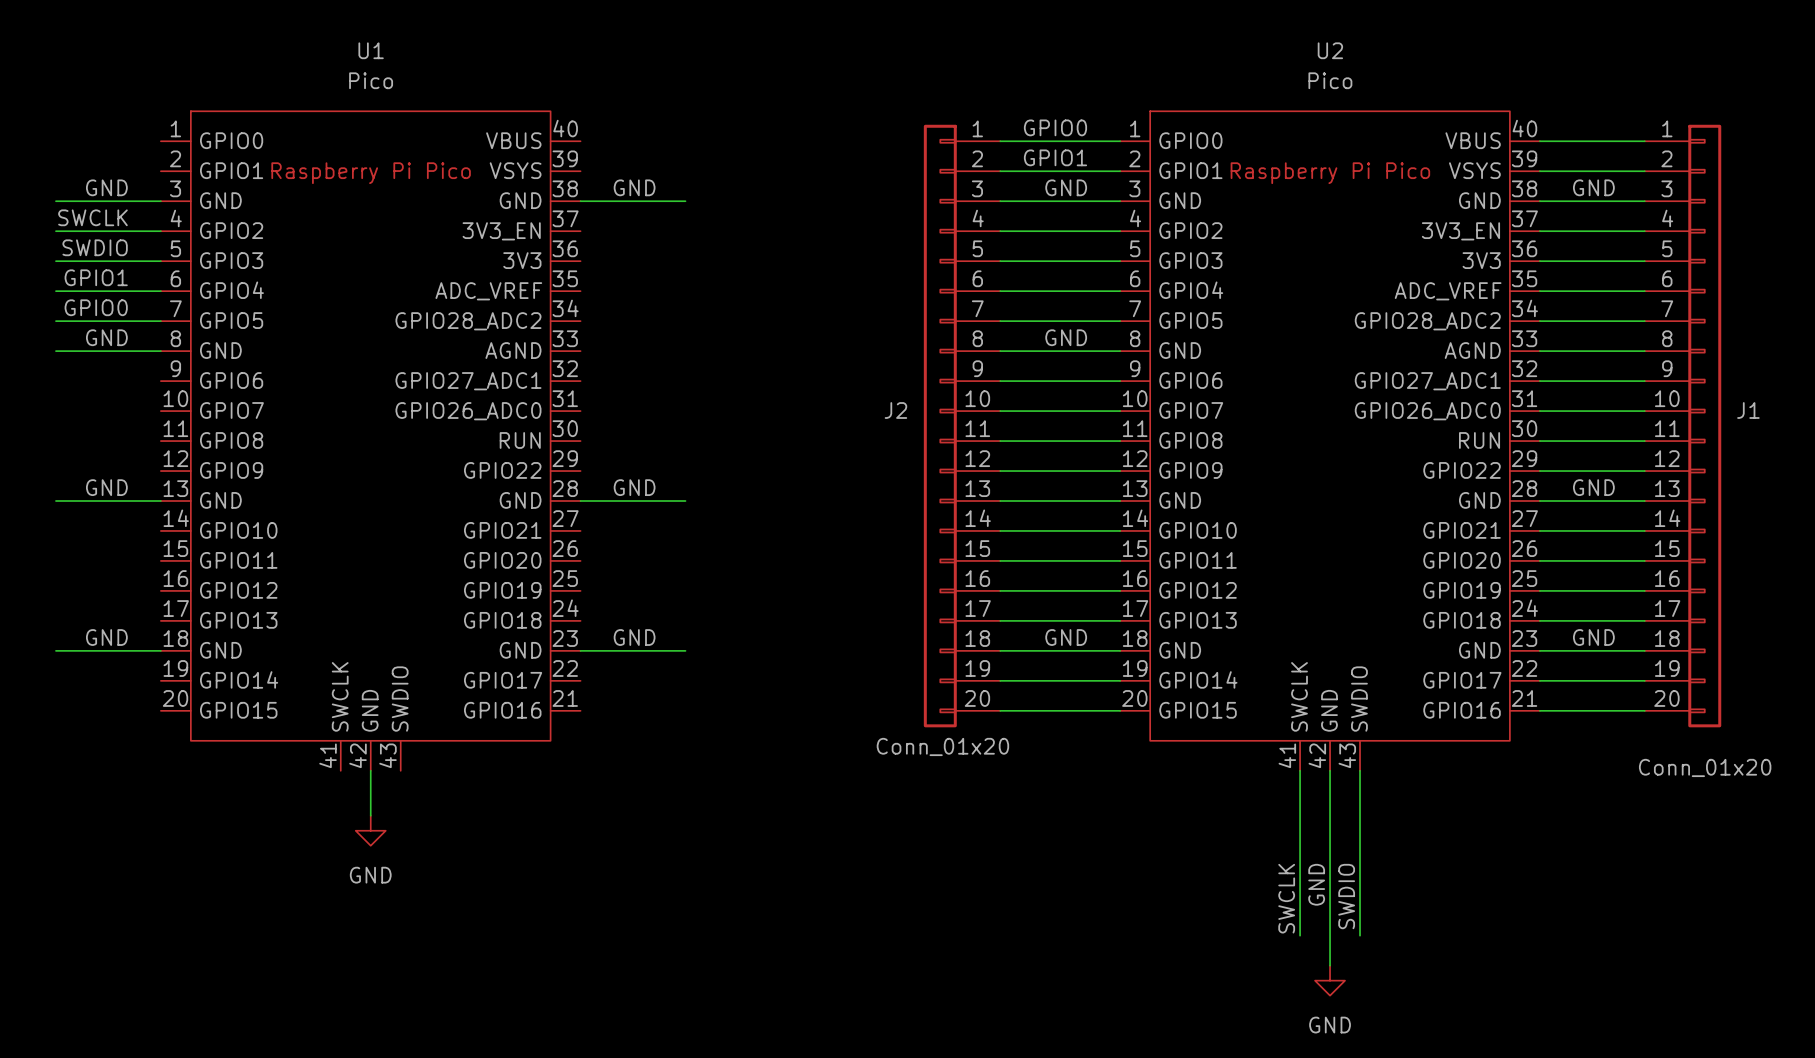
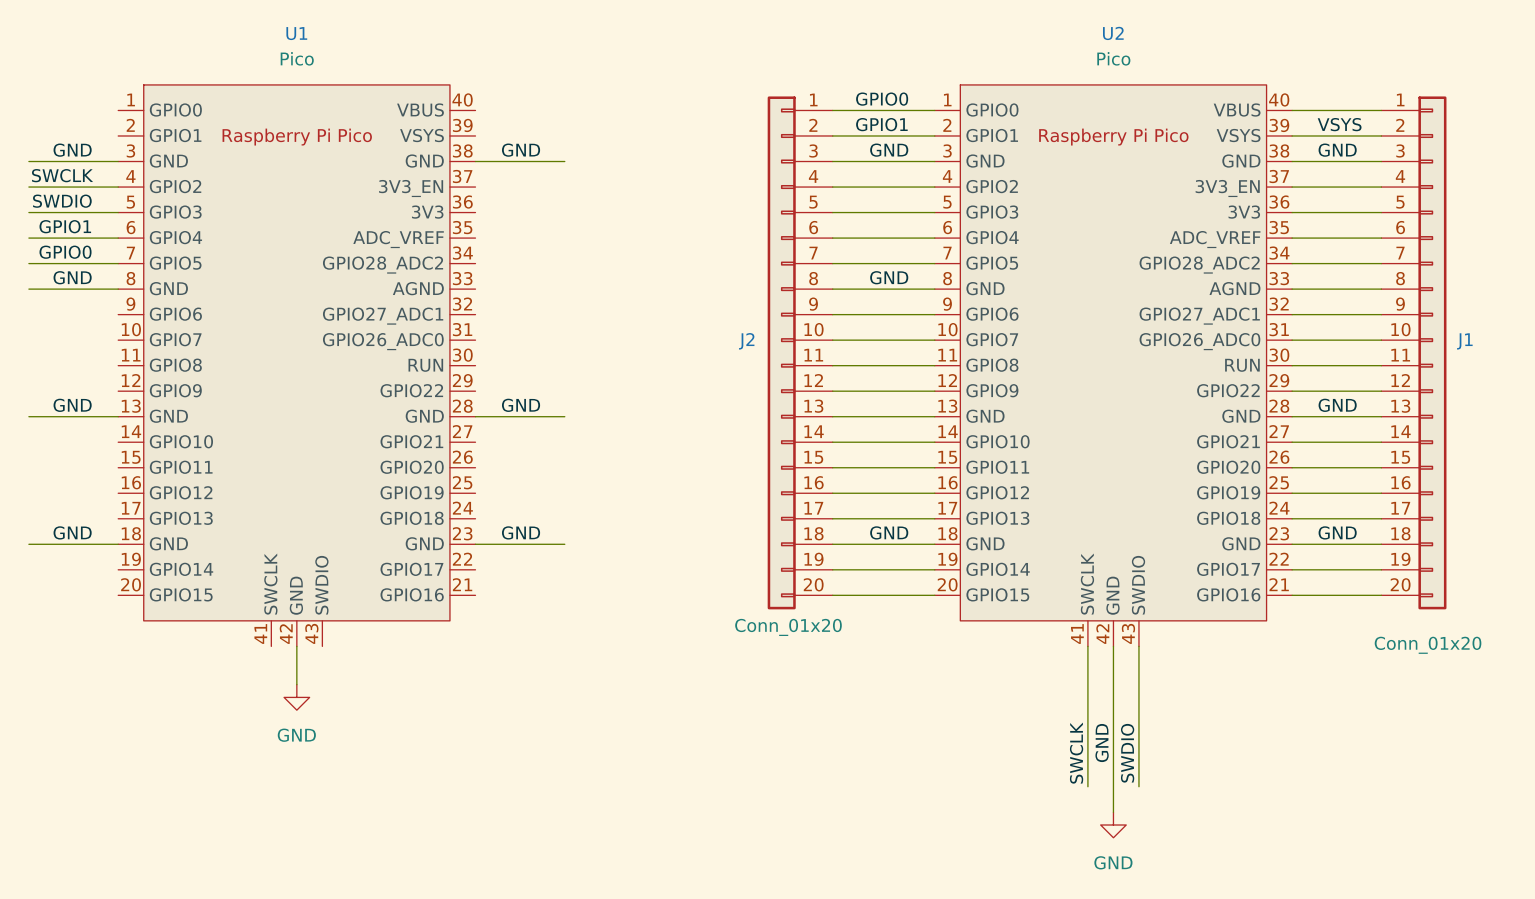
label: none -> VSYS (1339, 124)

